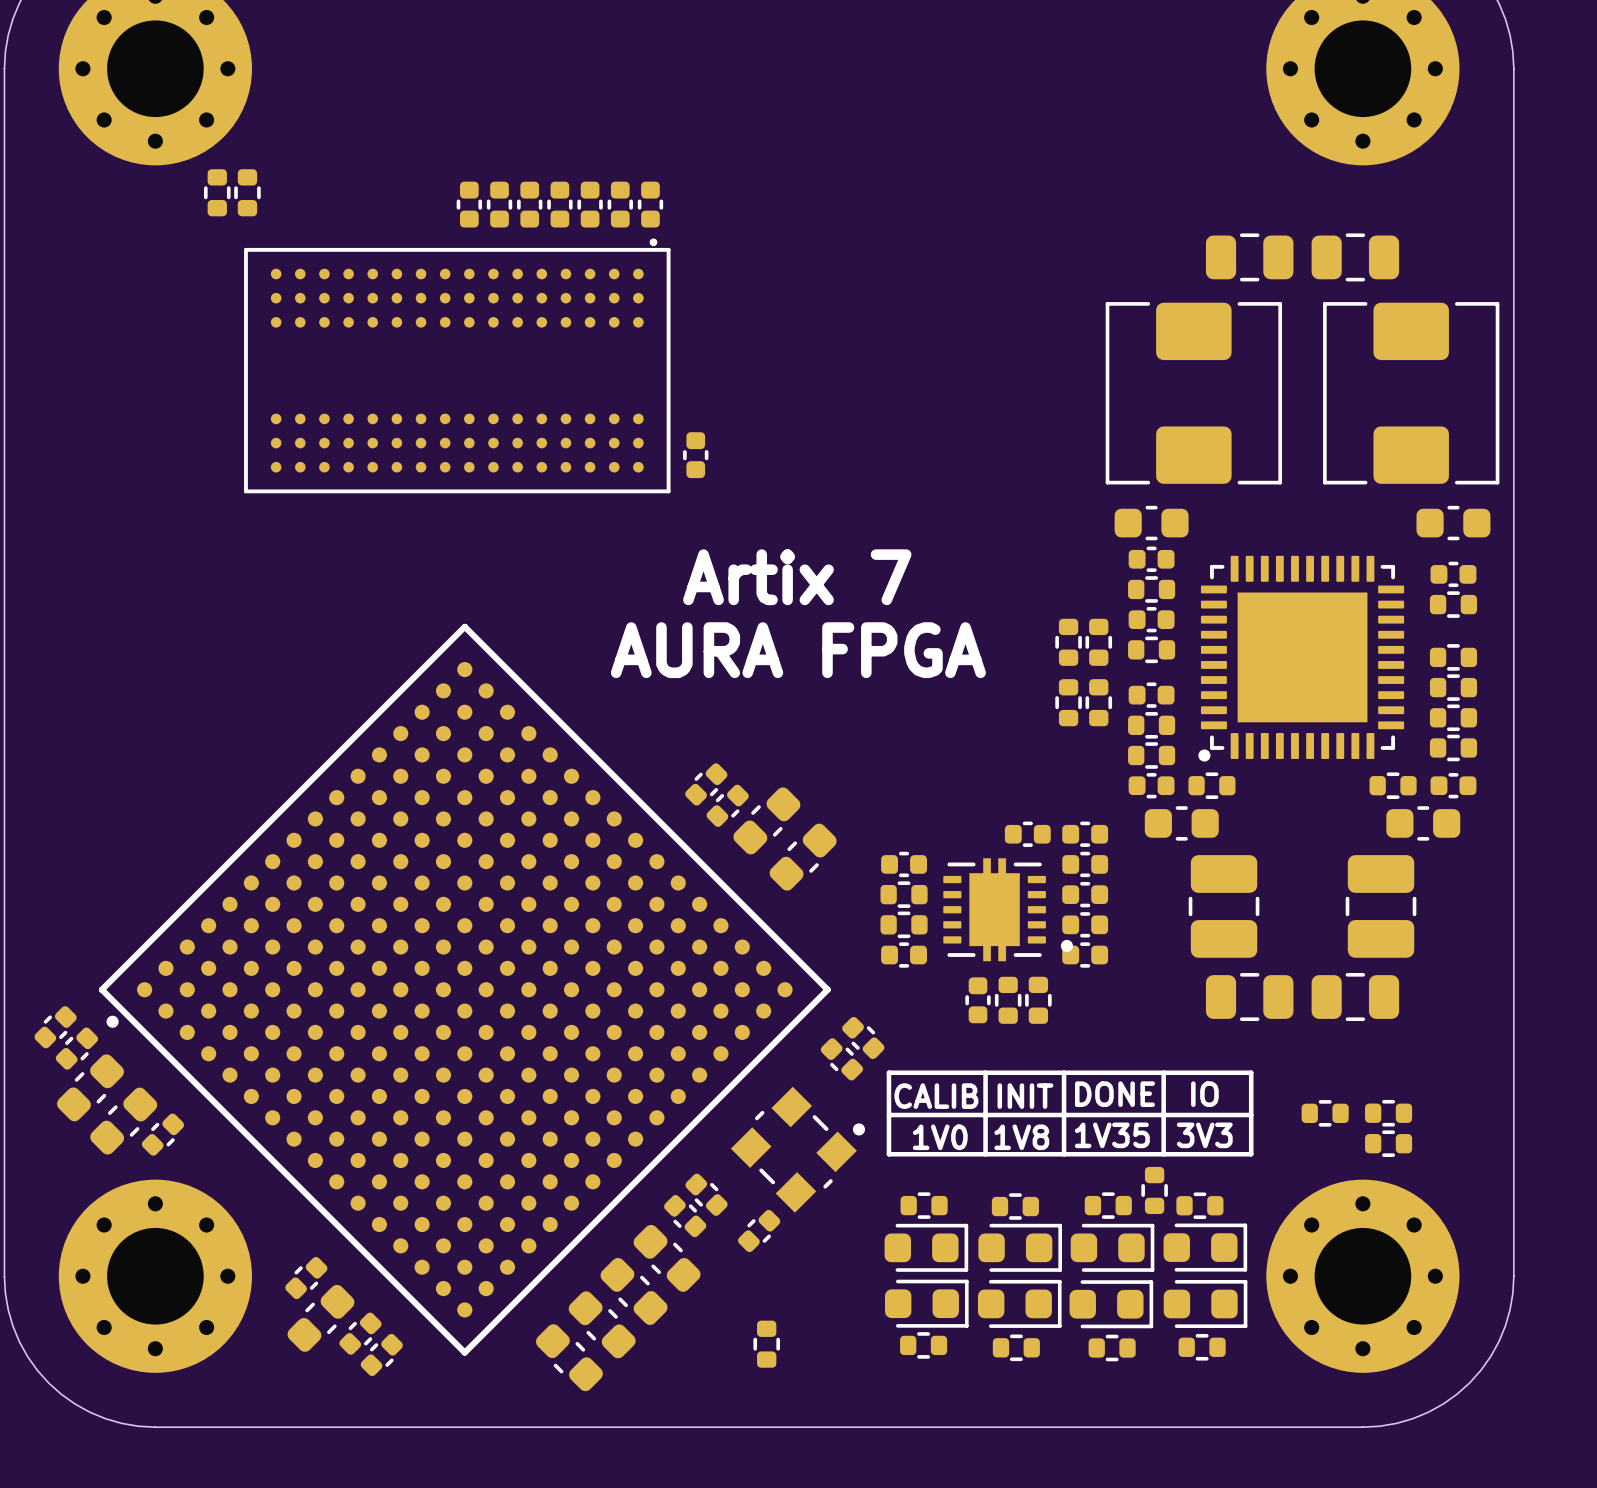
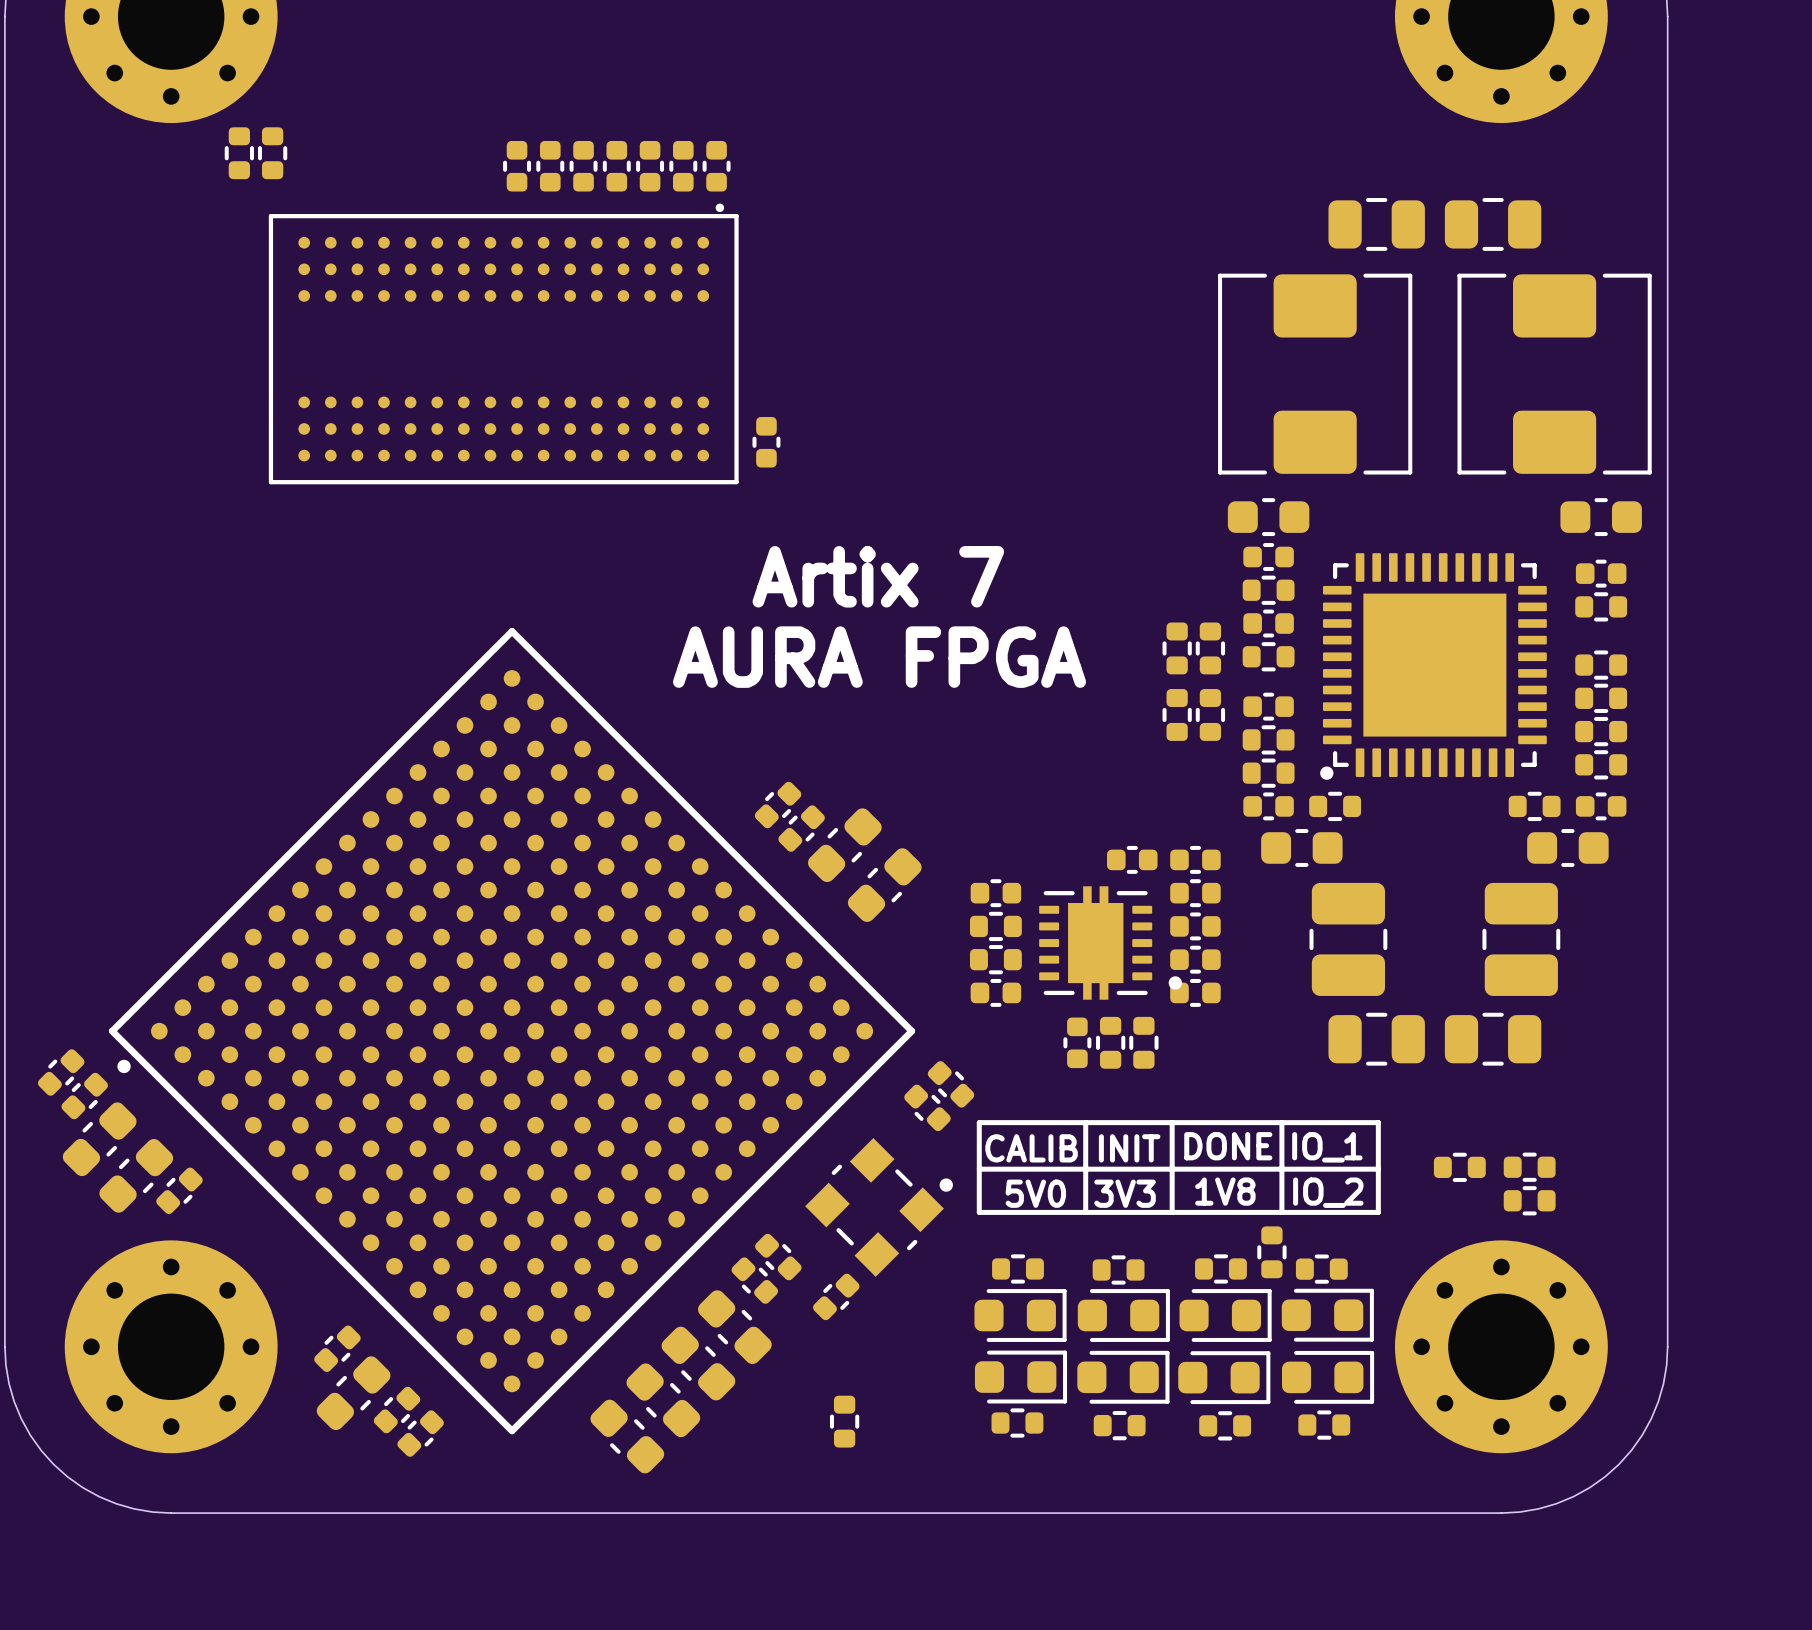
text: IO (1204, 1094) -> IO_1 (1327, 1147)
text: 1V35 (1112, 1135) -> 1V8 (1225, 1191)
text: 3V3 (1204, 1135) -> IO_2 (1328, 1192)
text: 1V0 (940, 1137) -> 5V0 (1035, 1193)
text: 1V8 (1021, 1137) -> 3V3 (1125, 1193)

